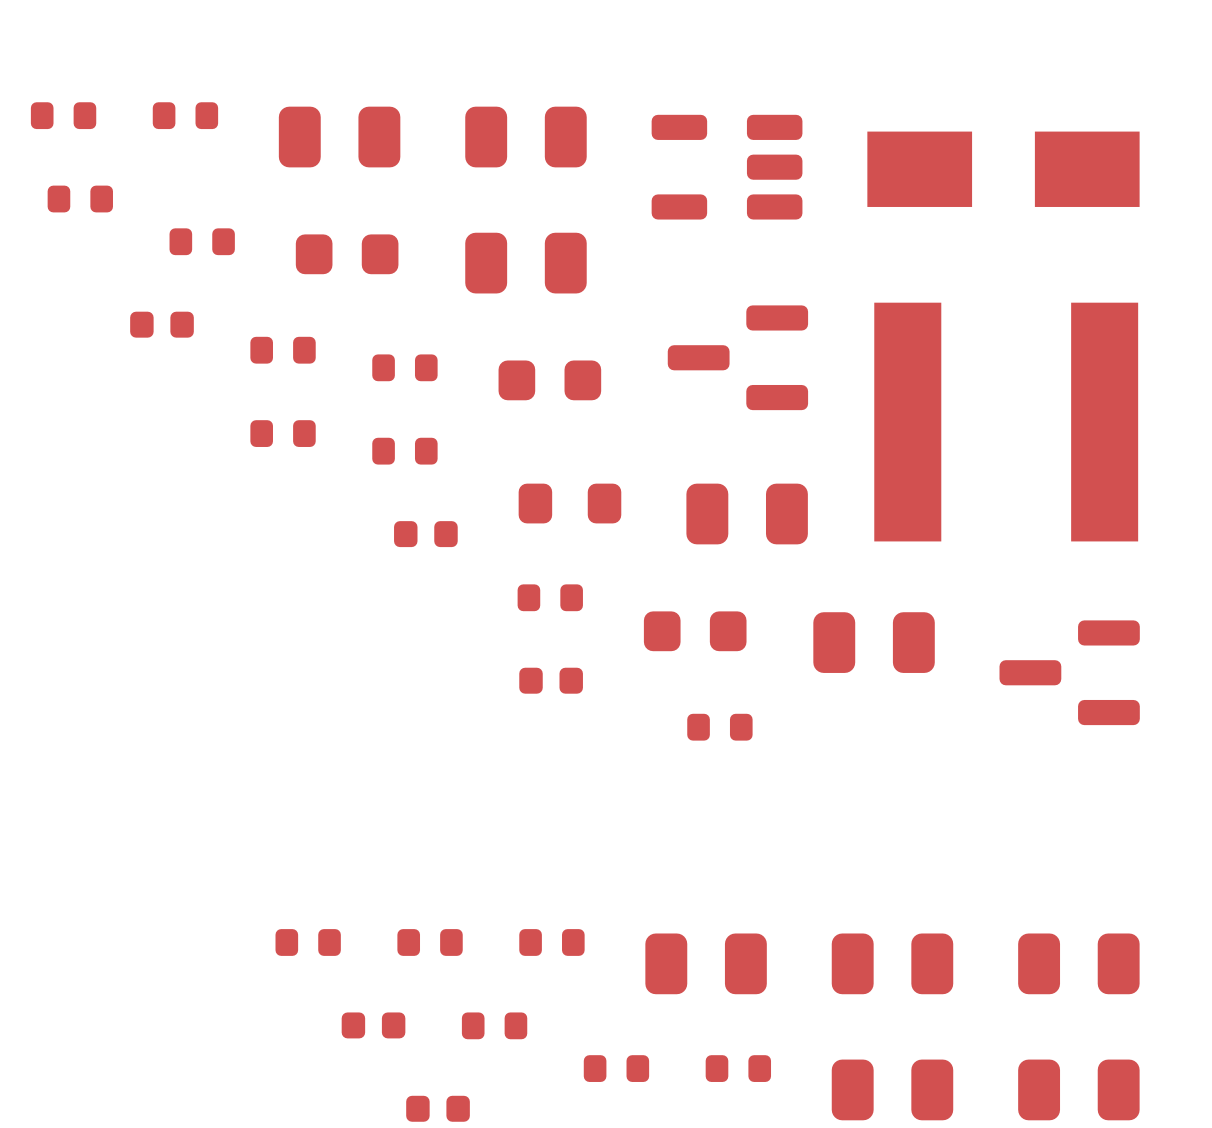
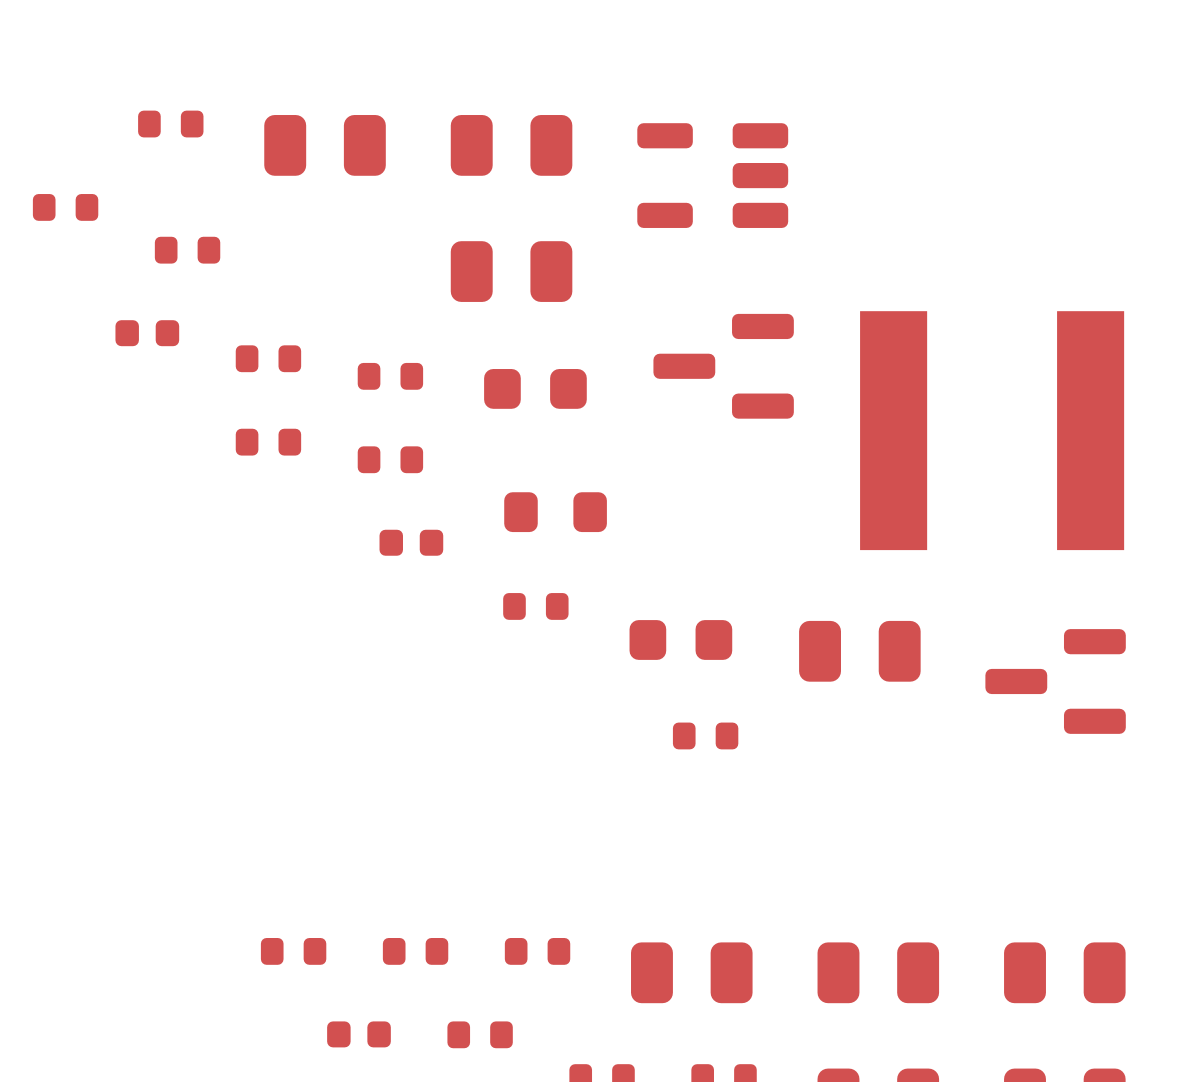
part: (63, 115) -> none
part: (1003, 169) -> none
part: (347, 254) -> none
part: (747, 513) -> none
part: (551, 680) -> none

